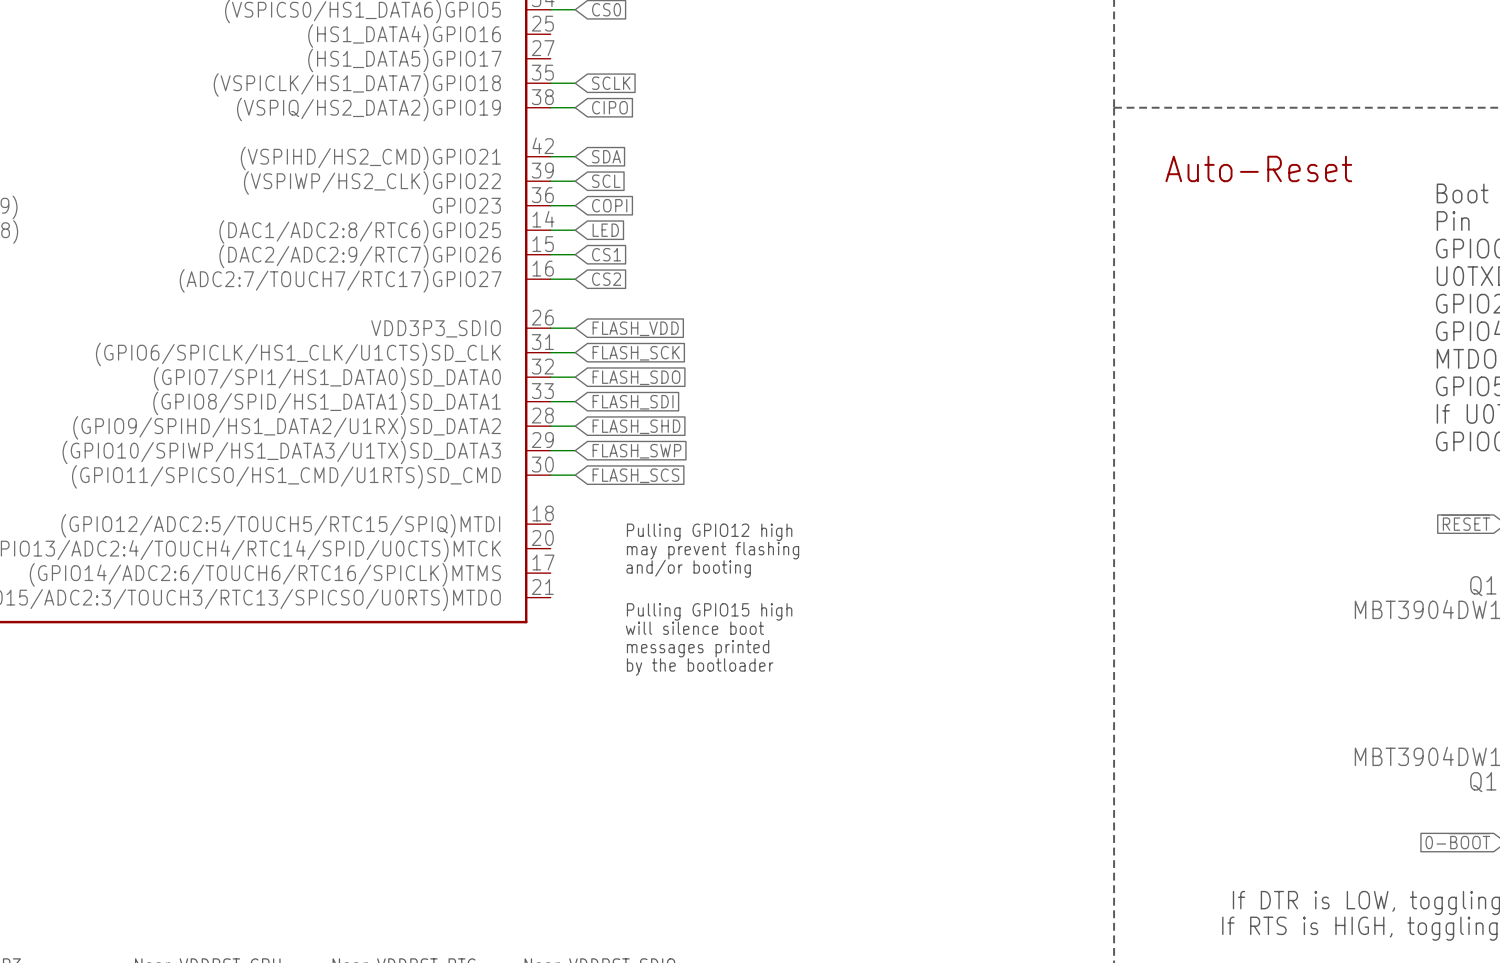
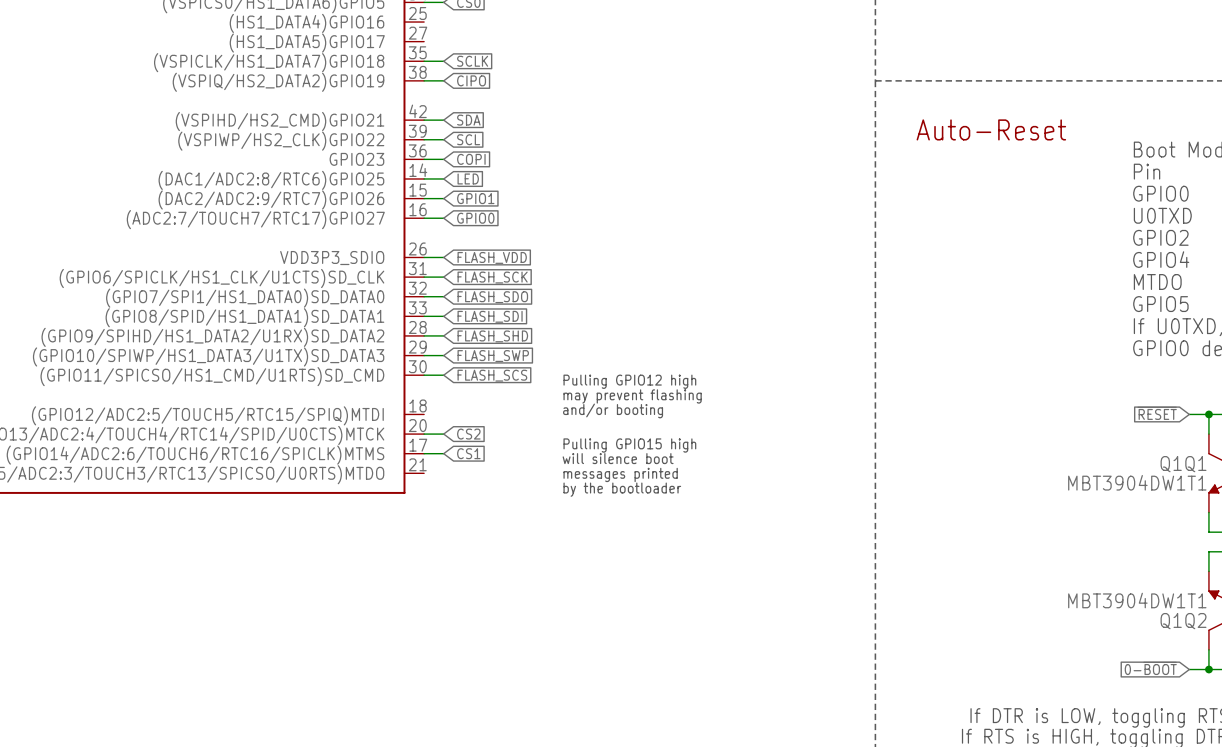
global label: CS1 (606, 254) -> GPIO1 (475, 198)
global label: CS2 (606, 279) -> GPIO0 (475, 218)
text position: Pulling GPIO12 high (709, 532) -> Pulling GPIO12 high (629, 381)
wire: none -> (424, 434) (443, 434)
global label: none -> CS2 (468, 434)
text position: may prevent flashing (713, 550) -> may prevent flashing (632, 396)
text position: and/or booting (688, 568) -> and/or booting (613, 410)
wire: none -> (424, 453) (443, 453)
global label: none -> CS1 (468, 453)
text position: Pulling GPIO15 high (709, 611) -> Pulling GPIO15 high (629, 445)
text position: will silence boot (694, 628) -> will silence boot (618, 458)
text position: messages printed (698, 648) -> messages printed (620, 474)
text position: by the bootloader (700, 667) -> by the bootloader (622, 489)

